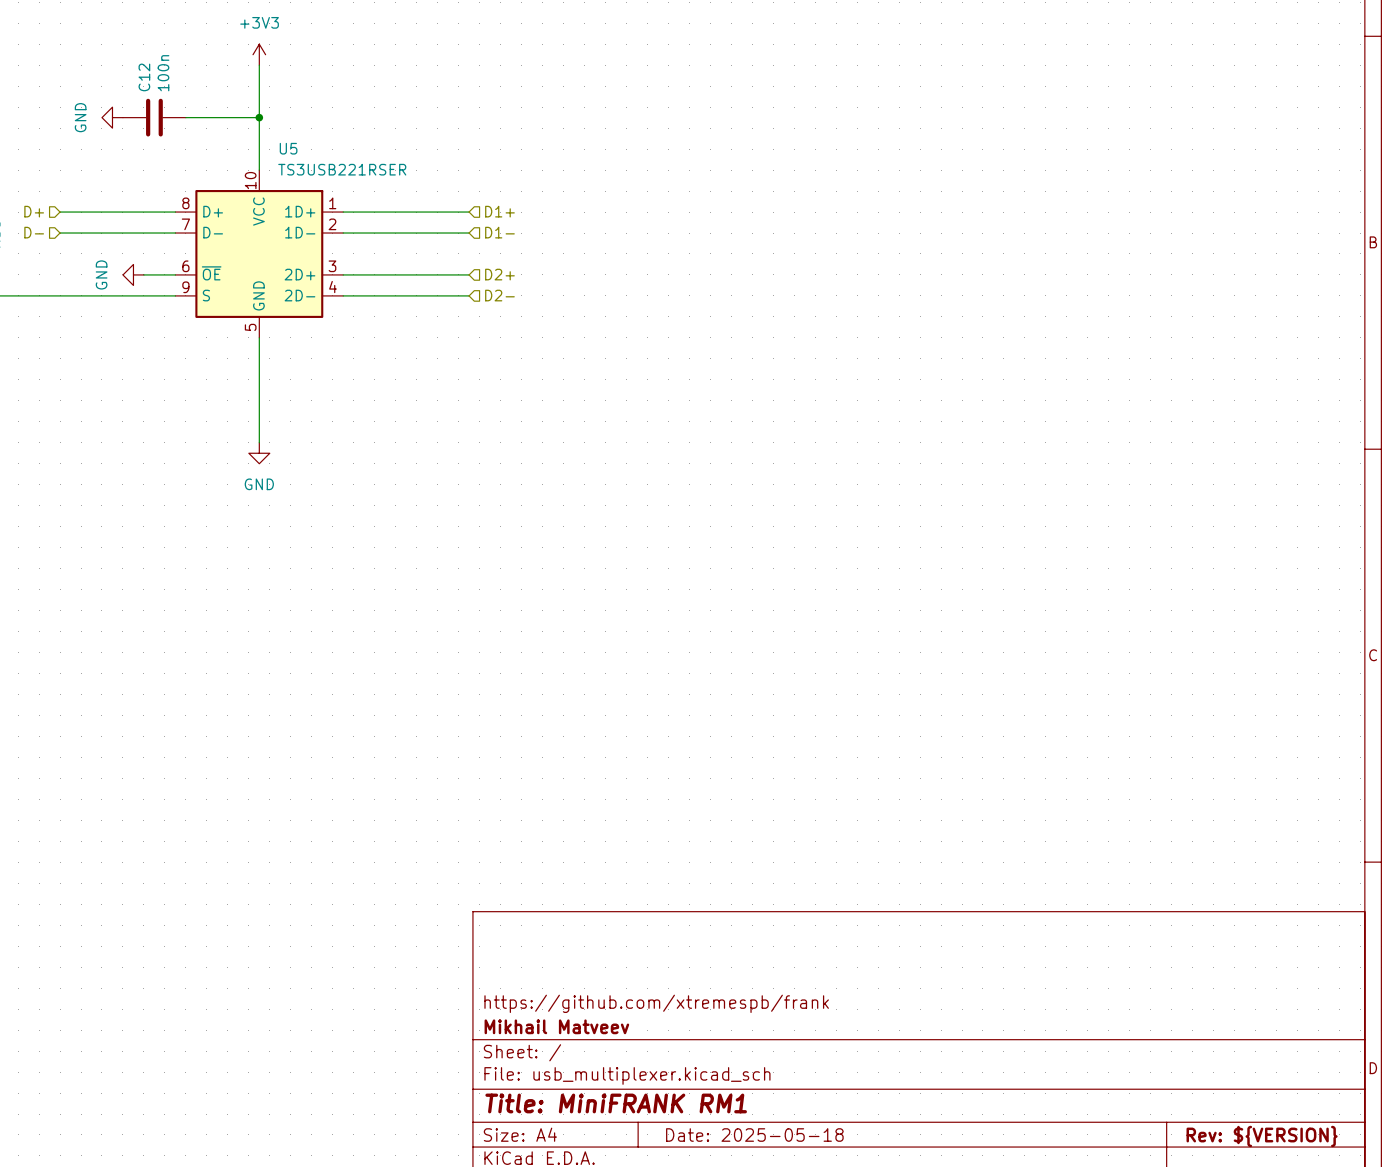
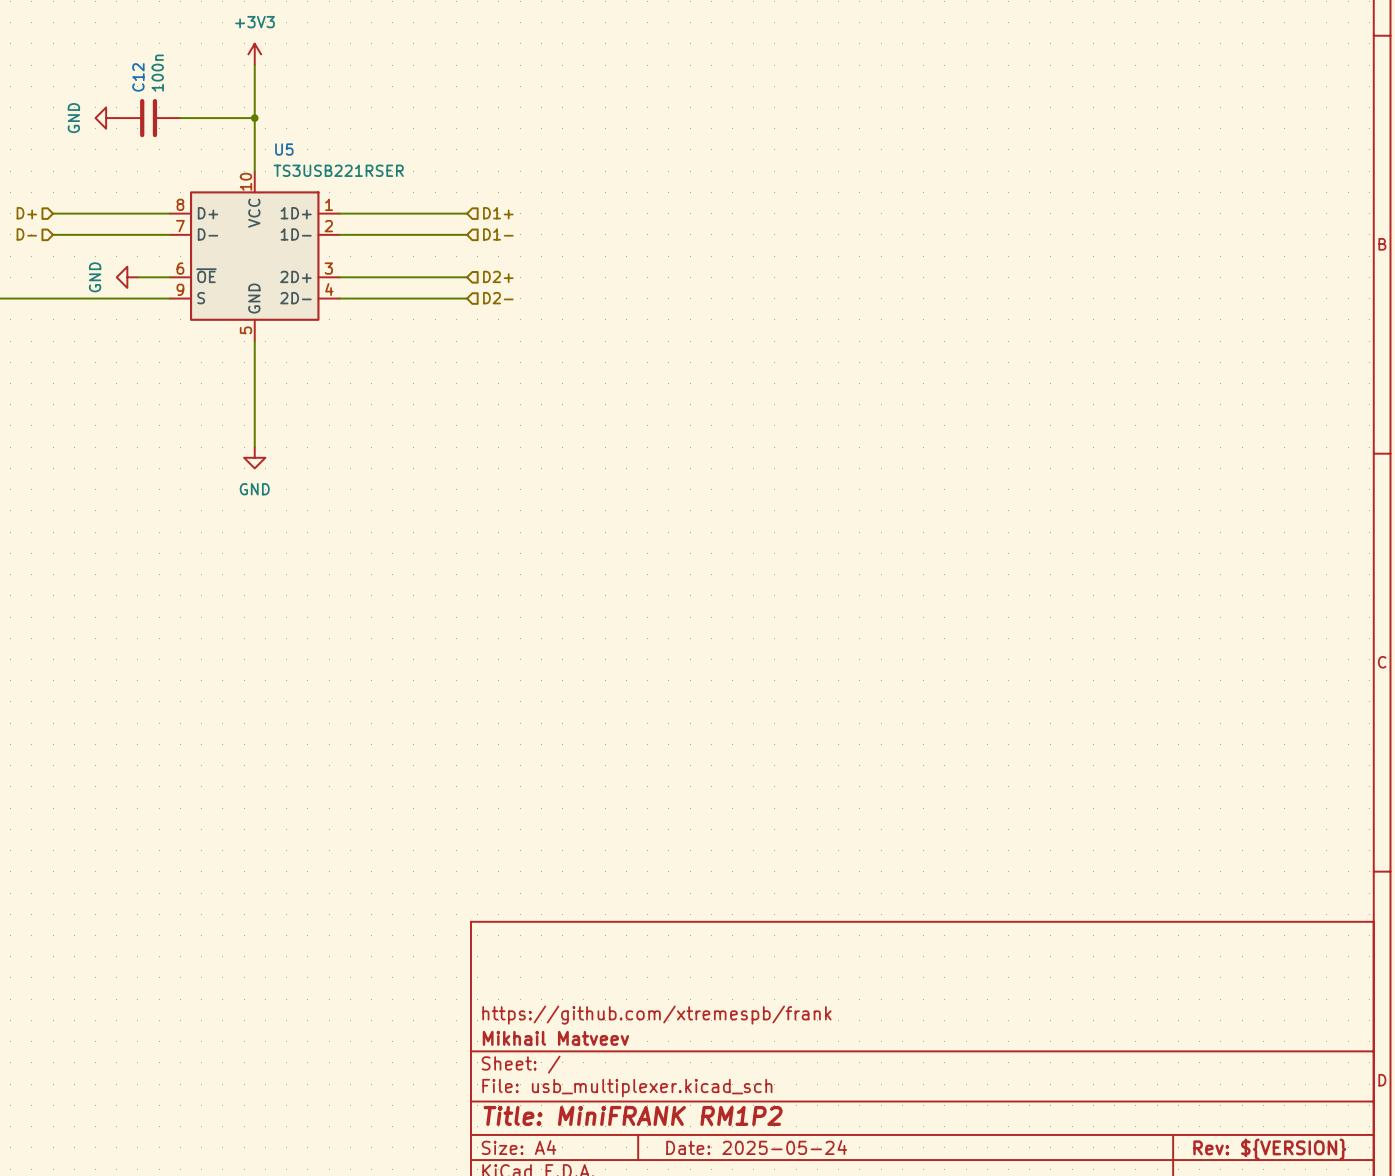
title block: Title: MiniFRANK RM1 (616, 1103) -> Title: MiniFRANK RM1P2 (633, 1115)
title block: Date: 2025-05-18 (754, 1135) -> Date: 2025-05-24 (756, 1147)

